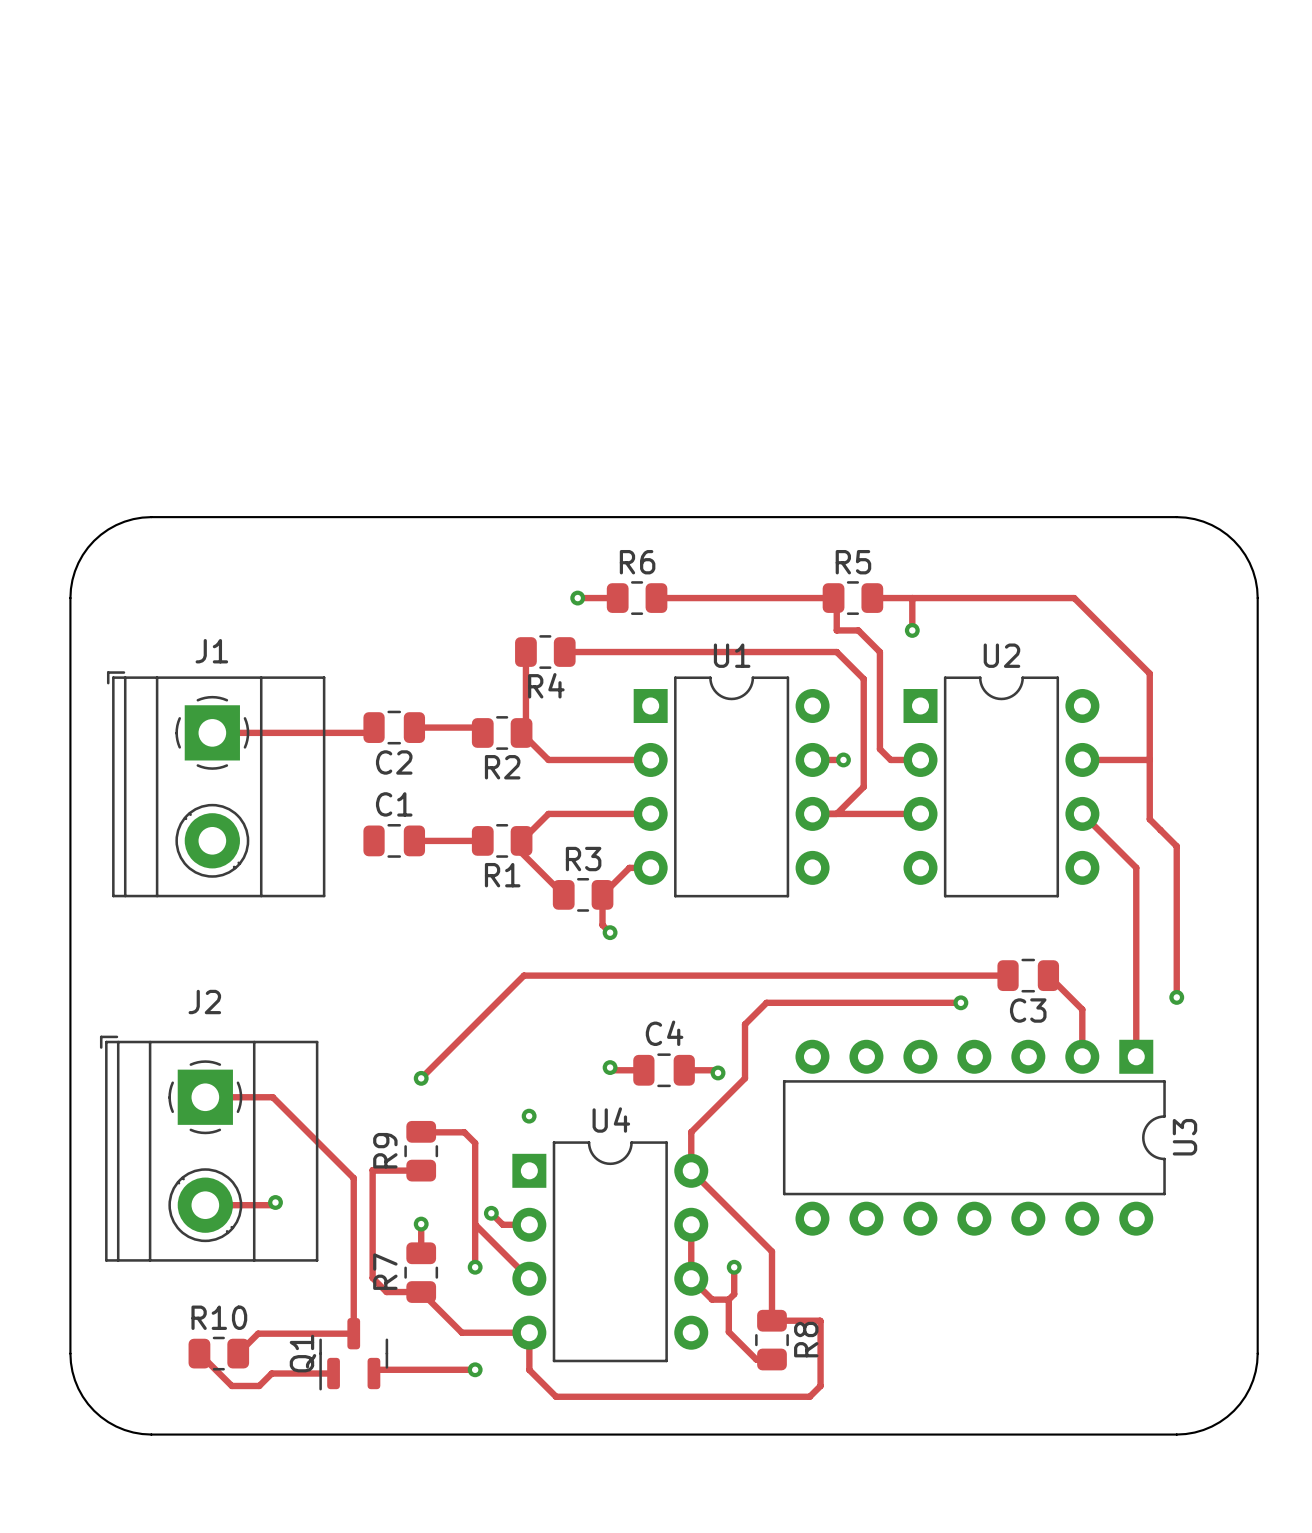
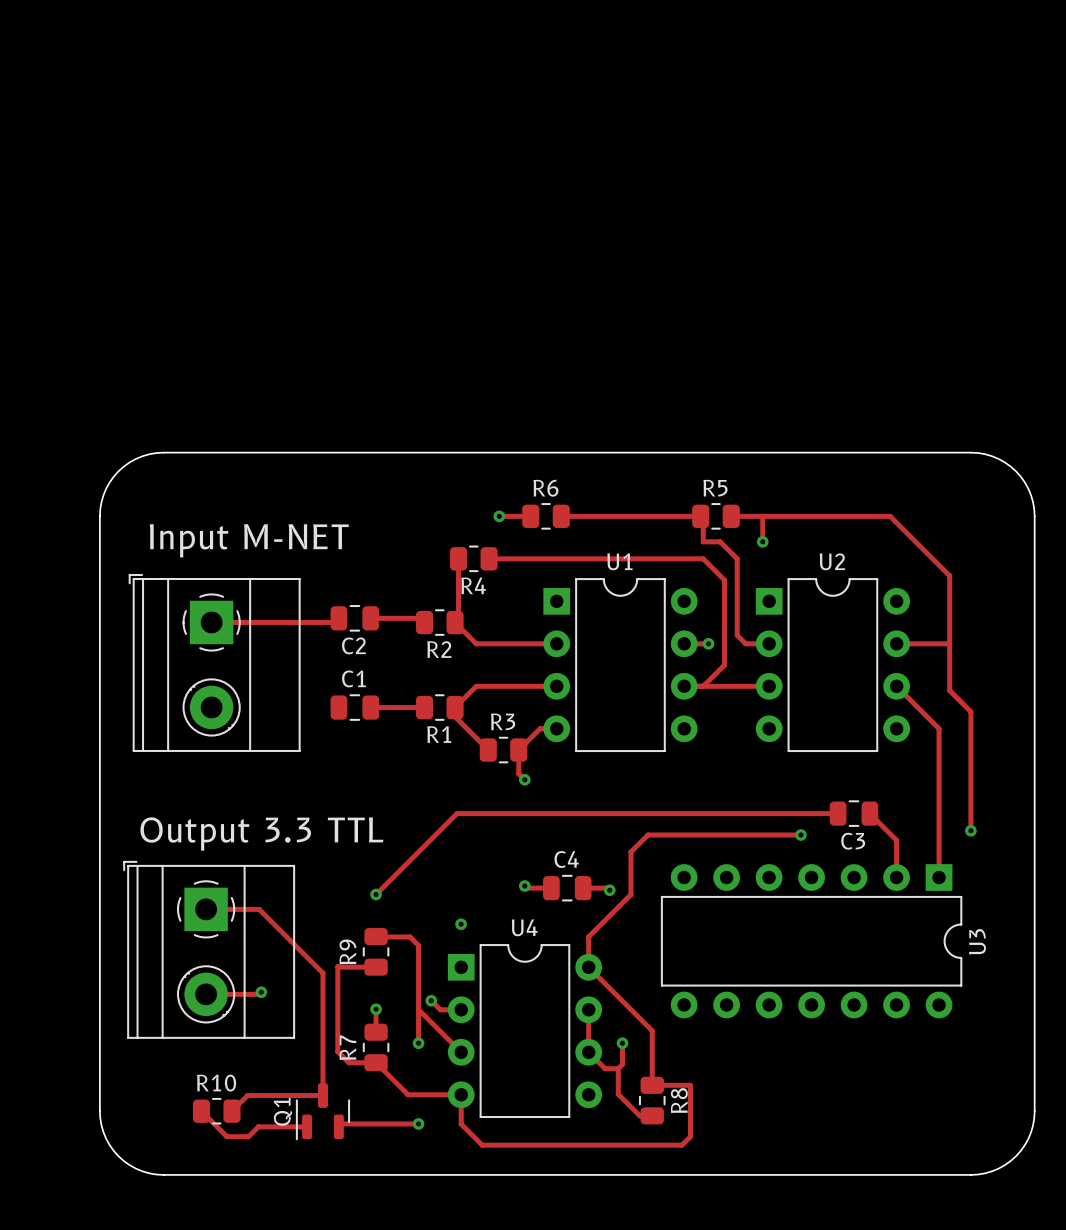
text: none -> Input M-NET (249, 540)
J1 name: J1 (211, 651) -> none
text: none -> Output 3.3 TTL (261, 833)
J2 name: J2 (204, 1002) -> none

